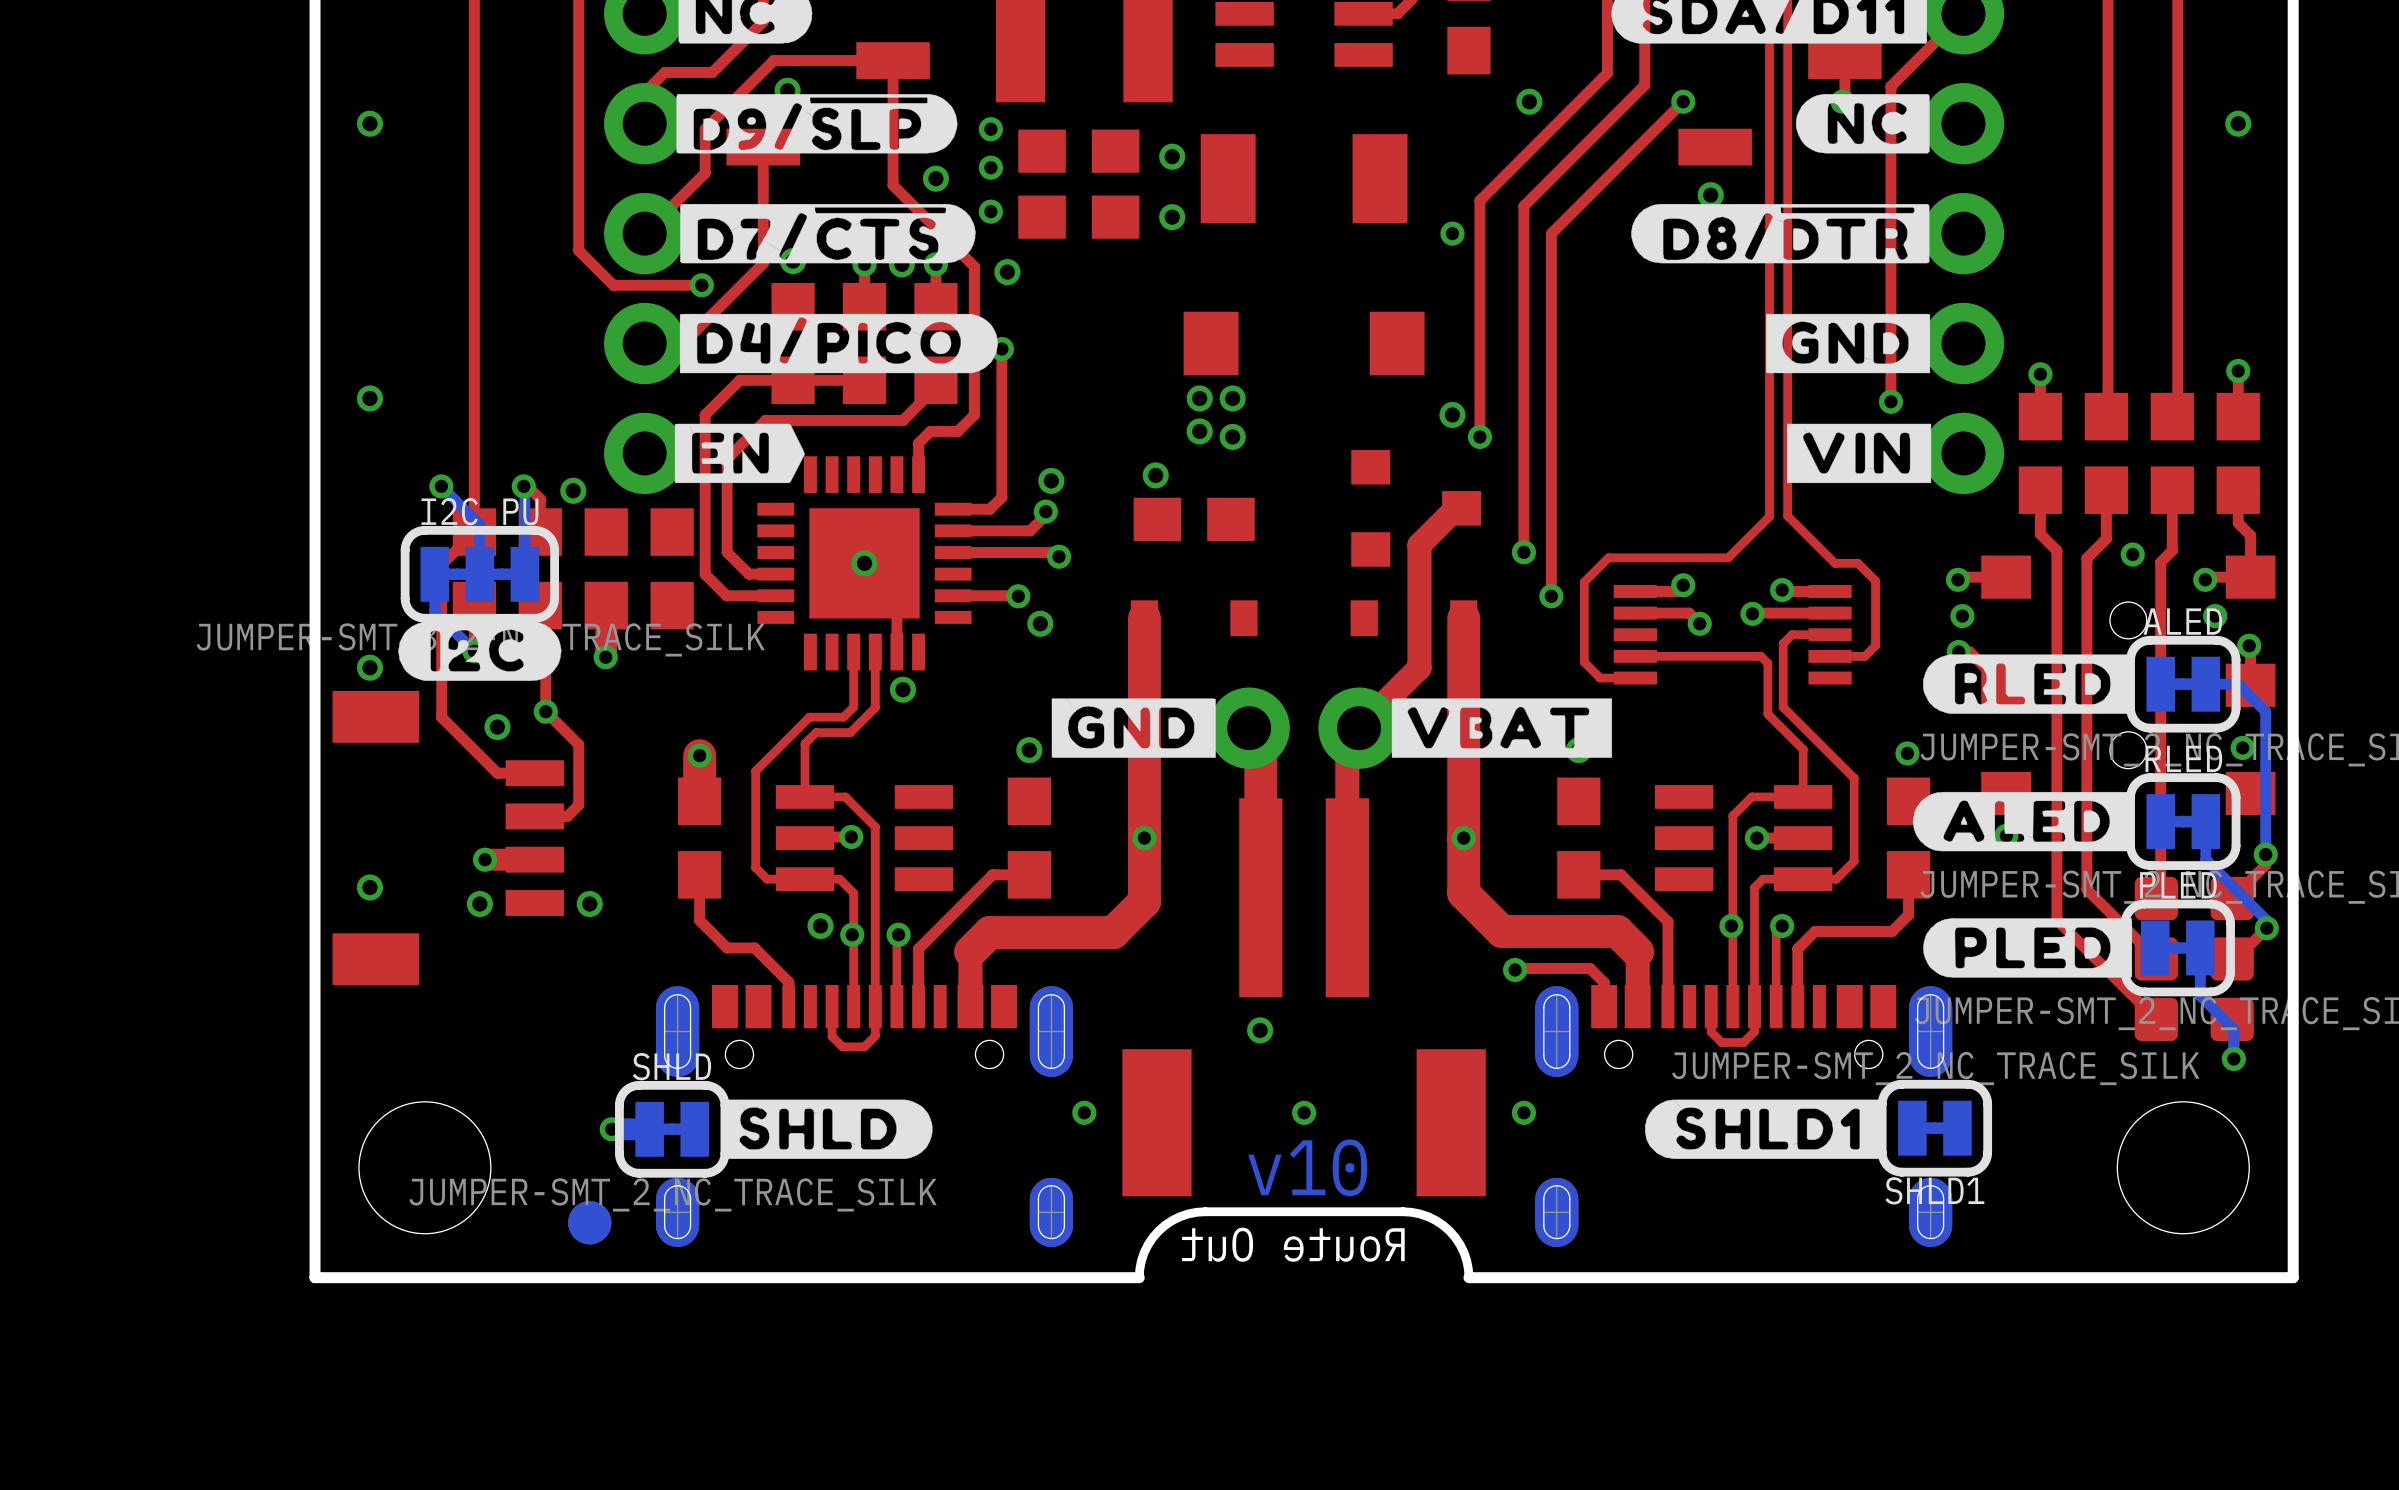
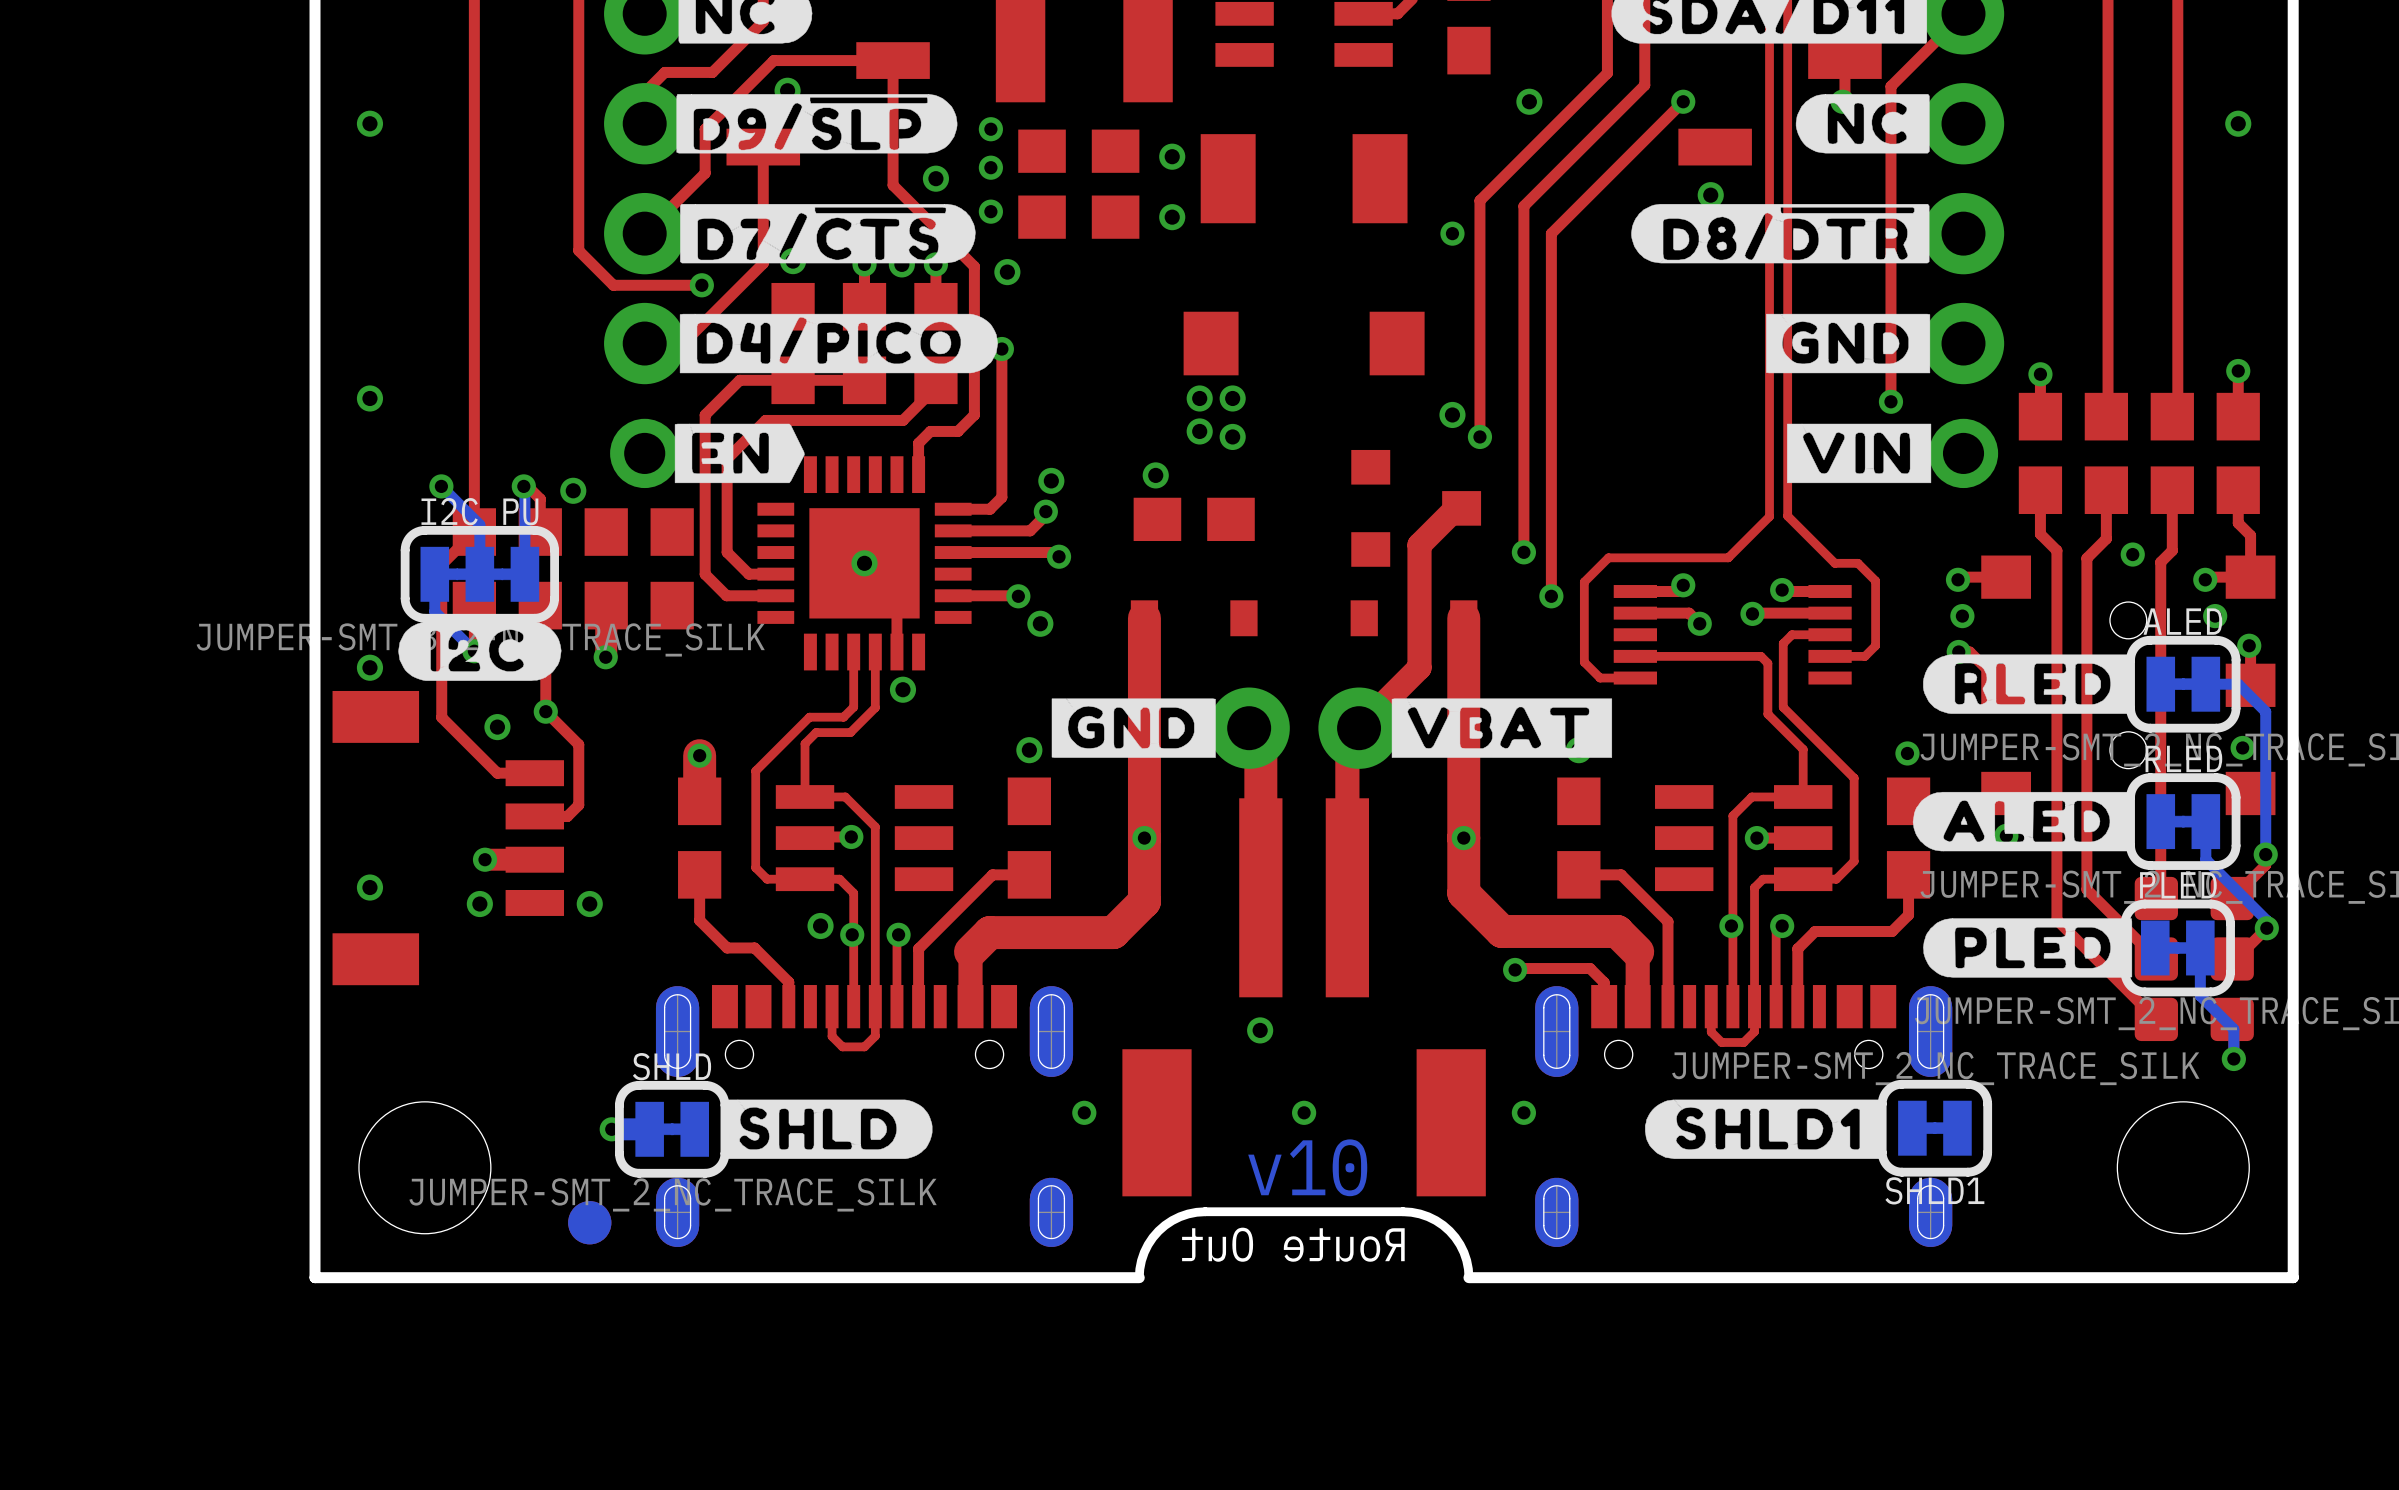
part footprint: [604, 412, 686, 495] -> [610, 418, 680, 489]
part footprint: [1922, 412, 2005, 495] -> [1928, 418, 1999, 489]

